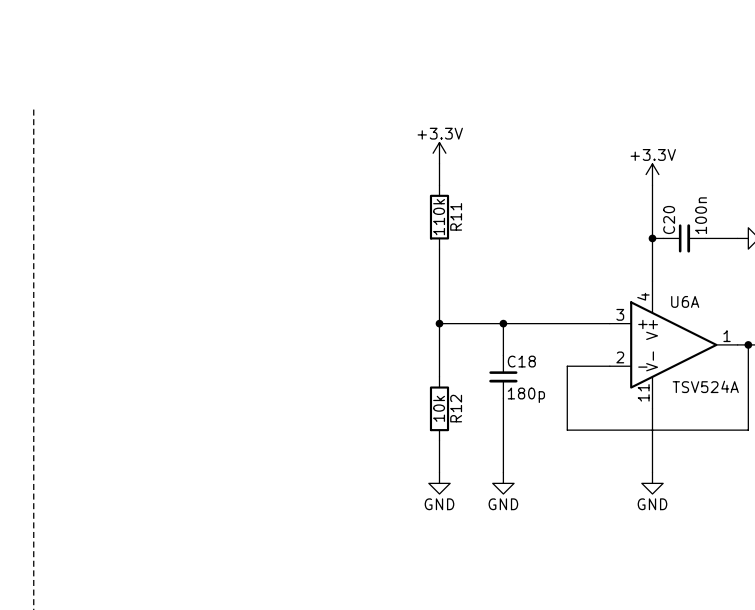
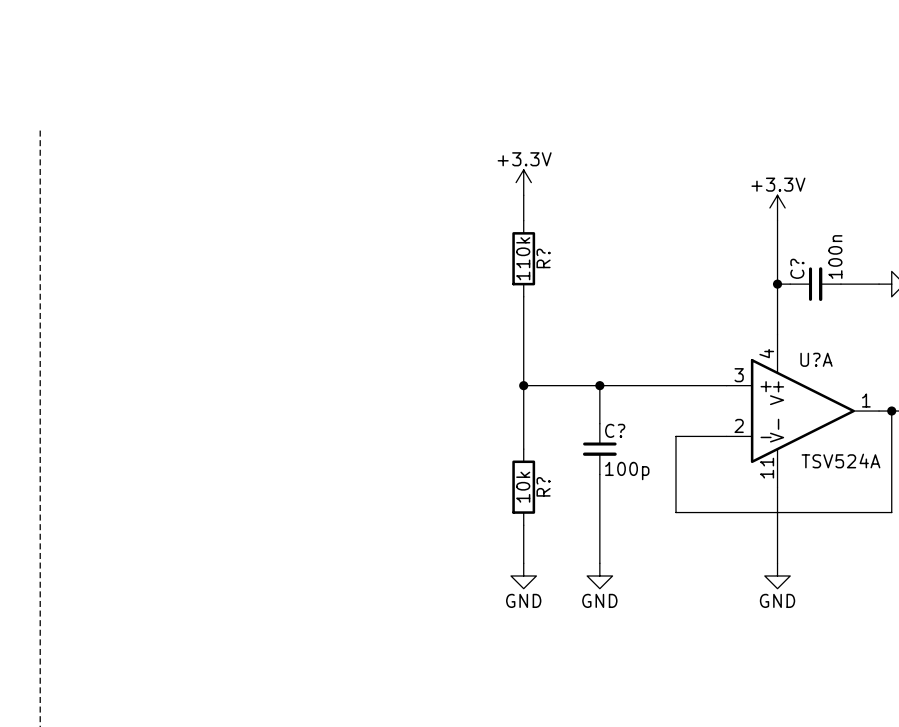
R11 name: R11 (456, 216) -> R? (543, 258)
C20 name: C20 (669, 219) -> C? (797, 268)
U6A name: U6A (685, 301) -> U?A (816, 359)
C18 name: C18 (521, 361) -> C? (615, 430)
C18 value: 180p (526, 395) -> 100p (627, 471)
R12 name: R12 (456, 408) -> R? (543, 486)

